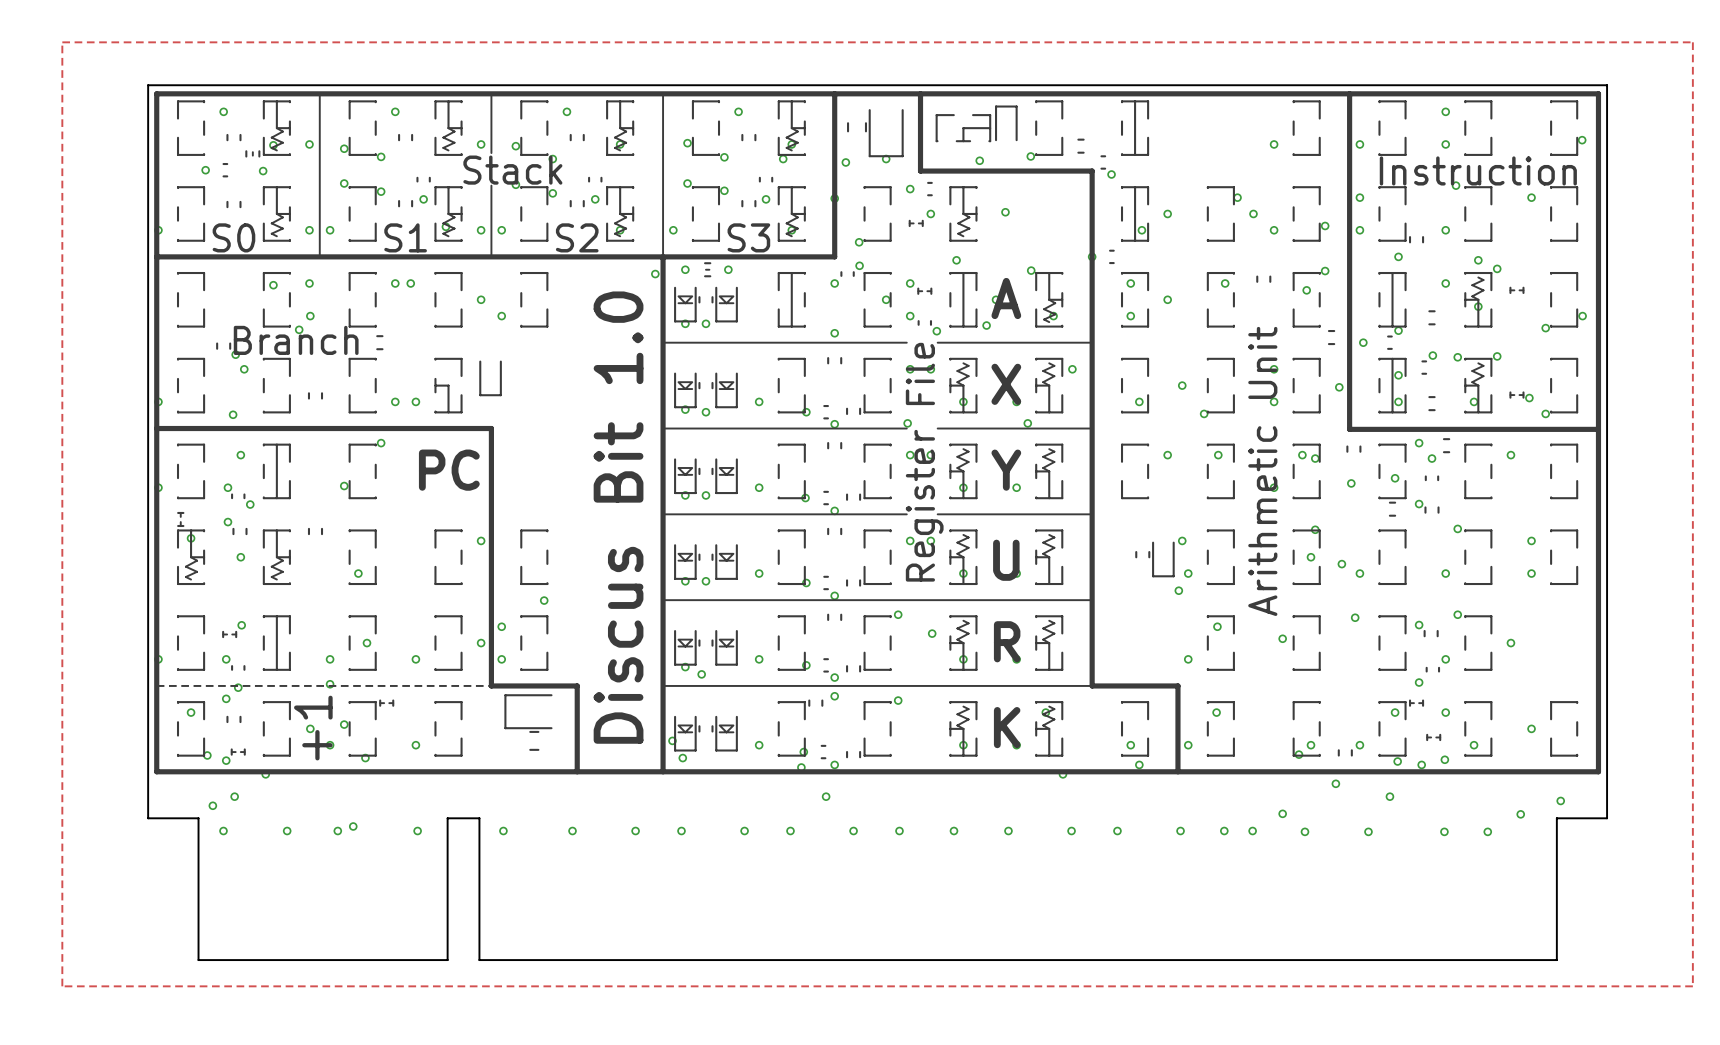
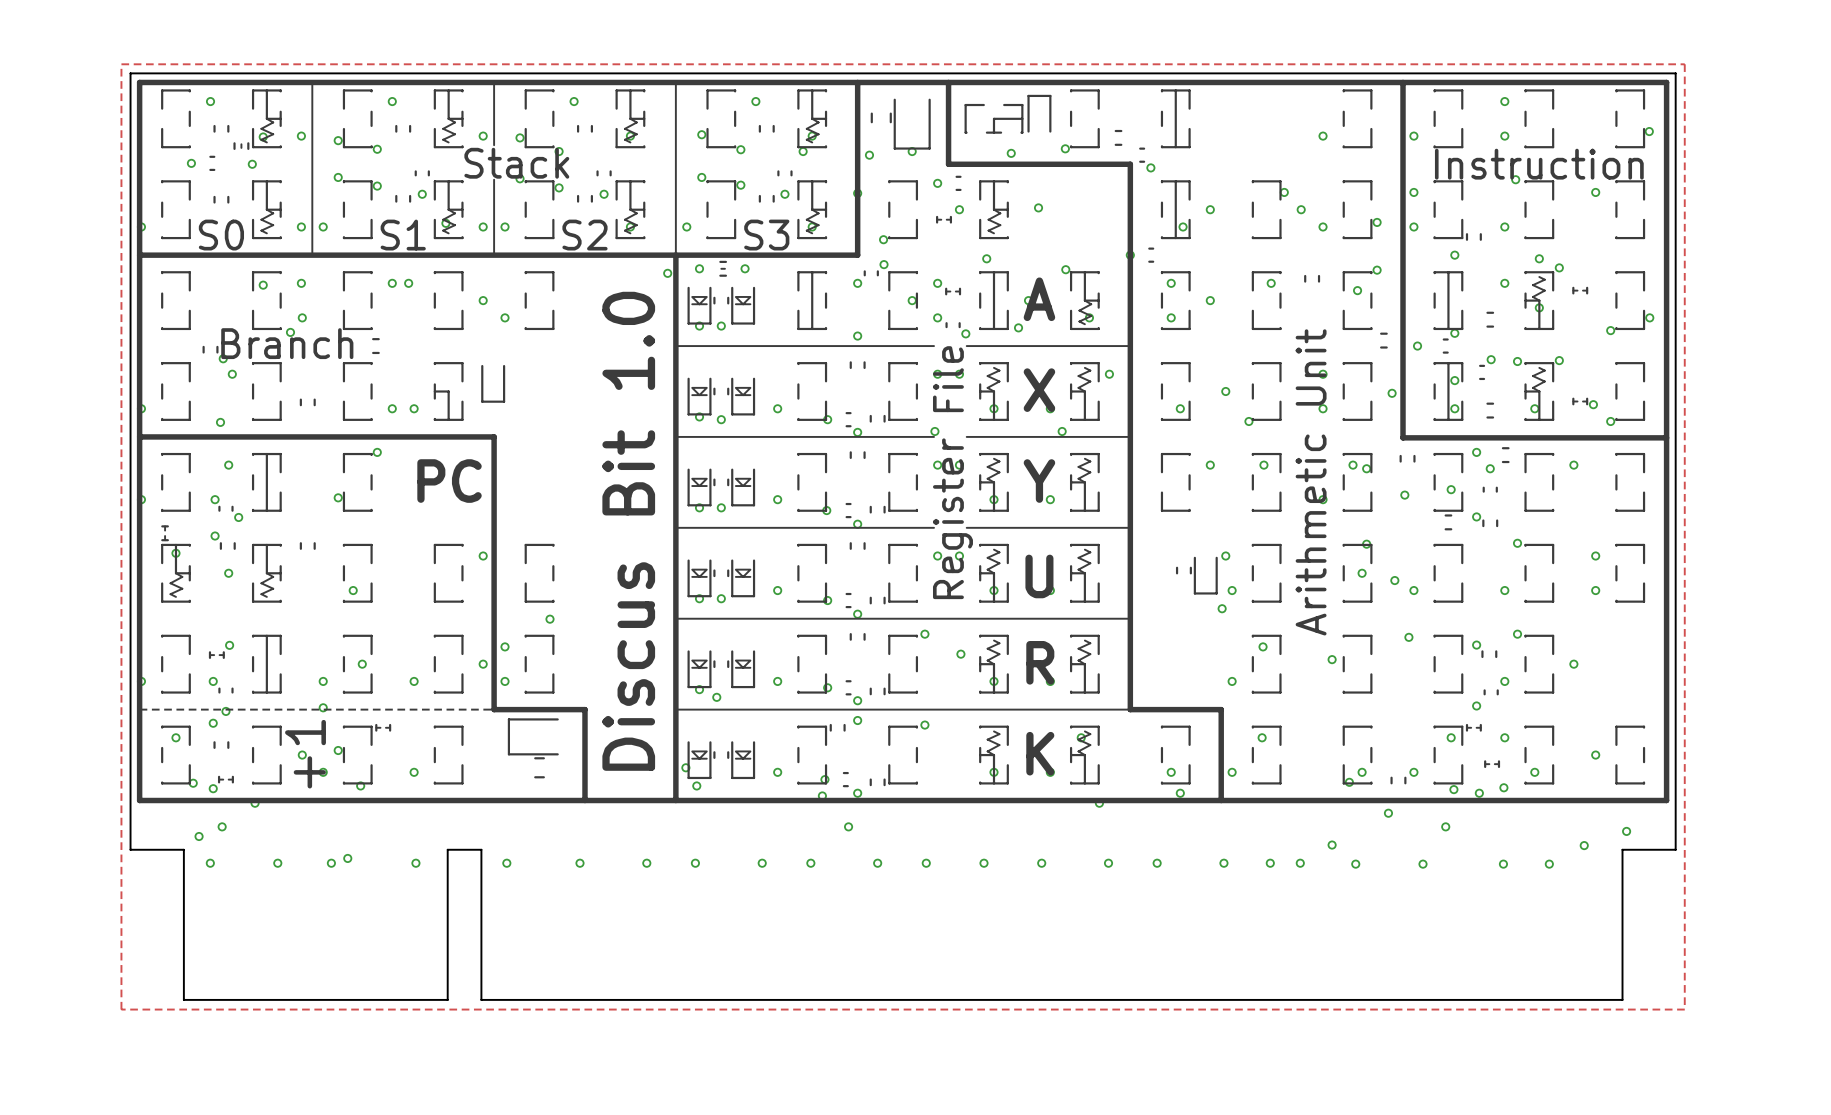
zone outline: (62, 42) (1692, 42) (1692, 986) (62, 986) (62, 42) -> (121, 64) (121, 1009) (1684, 1009) (1684, 64) (121, 64)

